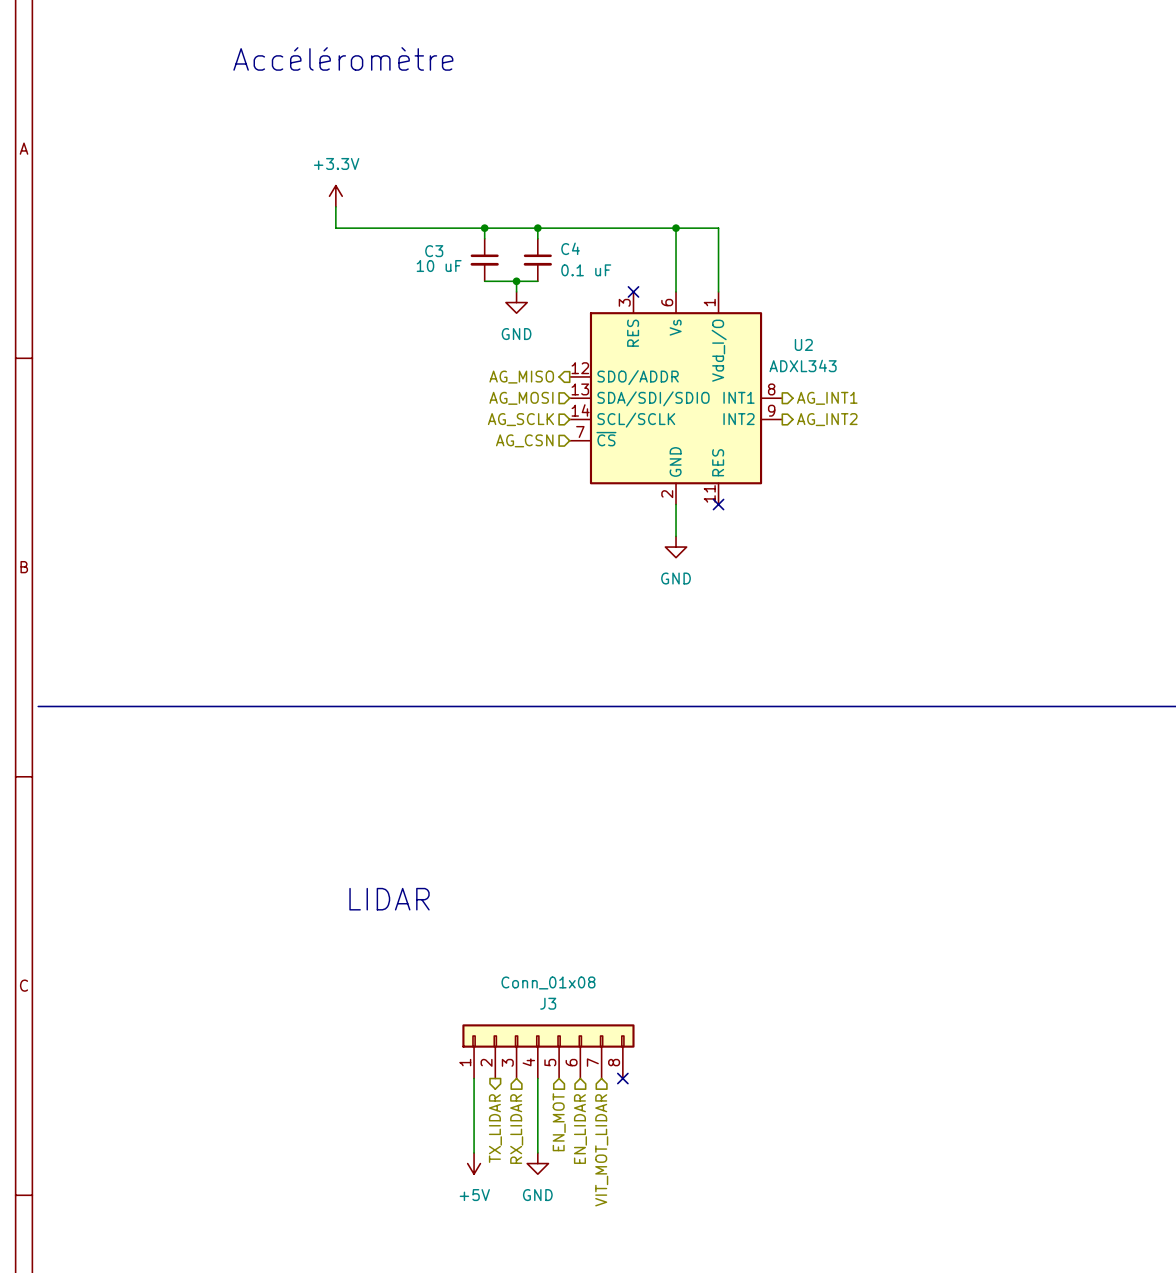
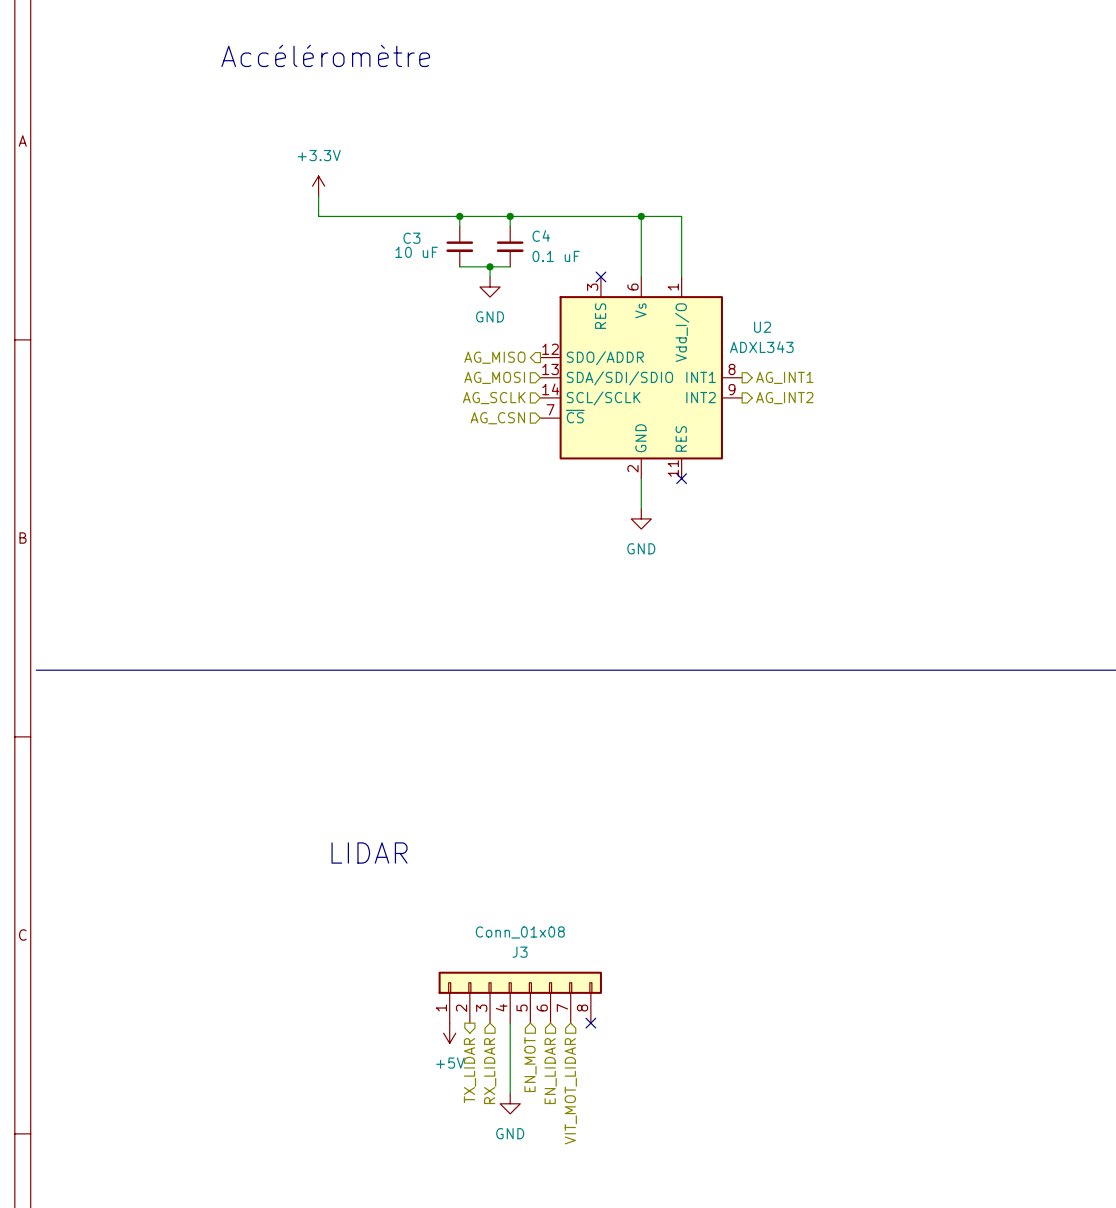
wire: (474, 1078) (474, 1152) -> none
power symbol position: +5V (474, 1163) -> +5V (449, 1033)

